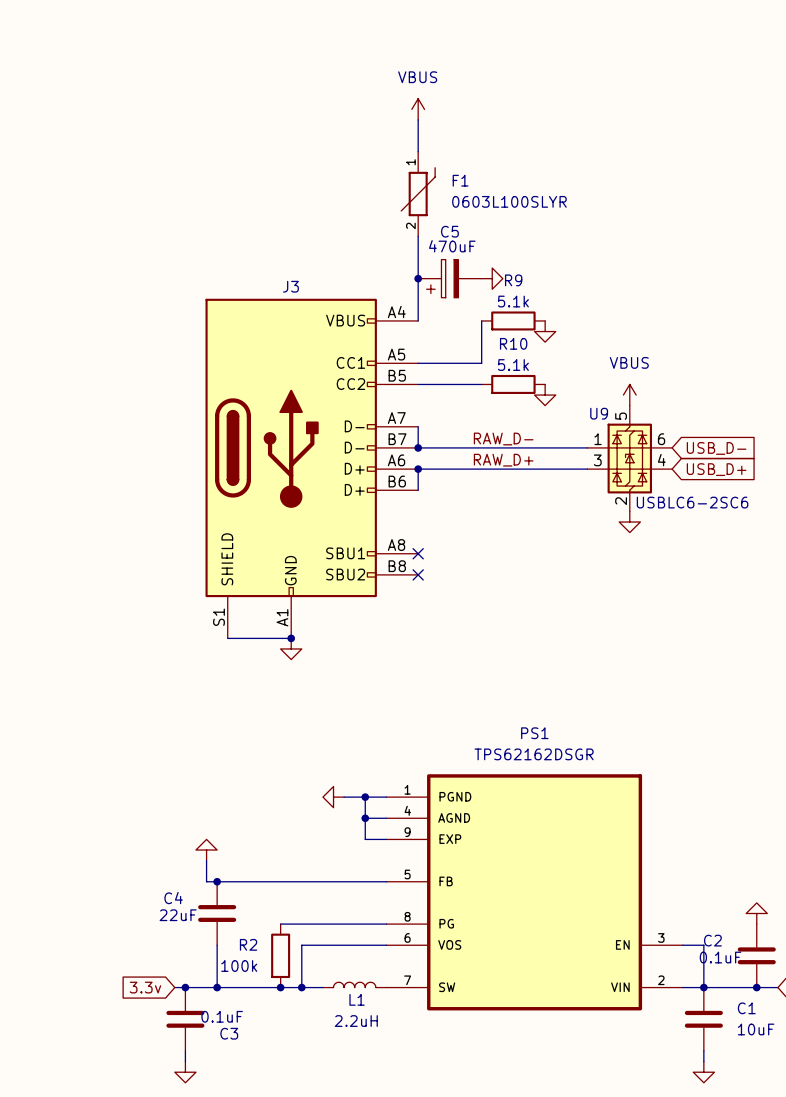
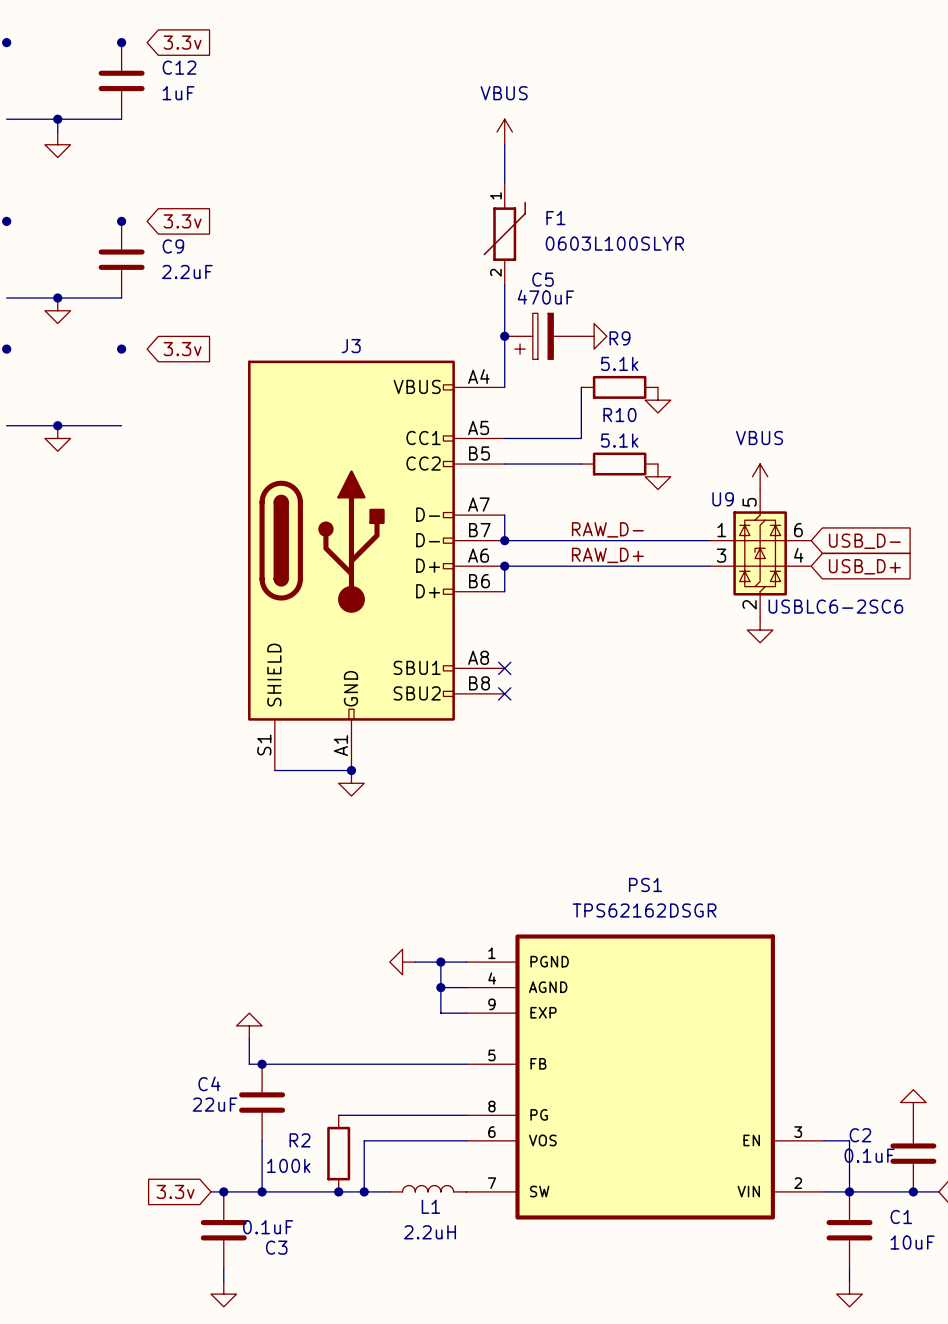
junction: none -> (6, 42)
junction: none -> (121, 42)
global label: none -> 3.3v (182, 42)
C12: none -> 1uF (121, 80)
wire: none -> (6, 119) (121, 119)
wire: none -> (57, 119) (57, 131)
junction: none -> (57, 119)
power symbol: none -> (57, 144)
junction: none -> (6, 221)
junction: none -> (121, 221)
global label: none -> 3.3v (182, 221)
C9: none -> 2.2uF (121, 259)
wire: none -> (6, 298) (121, 298)
junction: none -> (57, 298)
power symbol: none -> (57, 310)
junction: none -> (6, 349)
junction: none -> (121, 349)
global label: none -> 3.3v (182, 349)
wire: none -> (6, 425) (121, 425)
junction: none -> (57, 425)
power symbol: none -> (57, 438)

